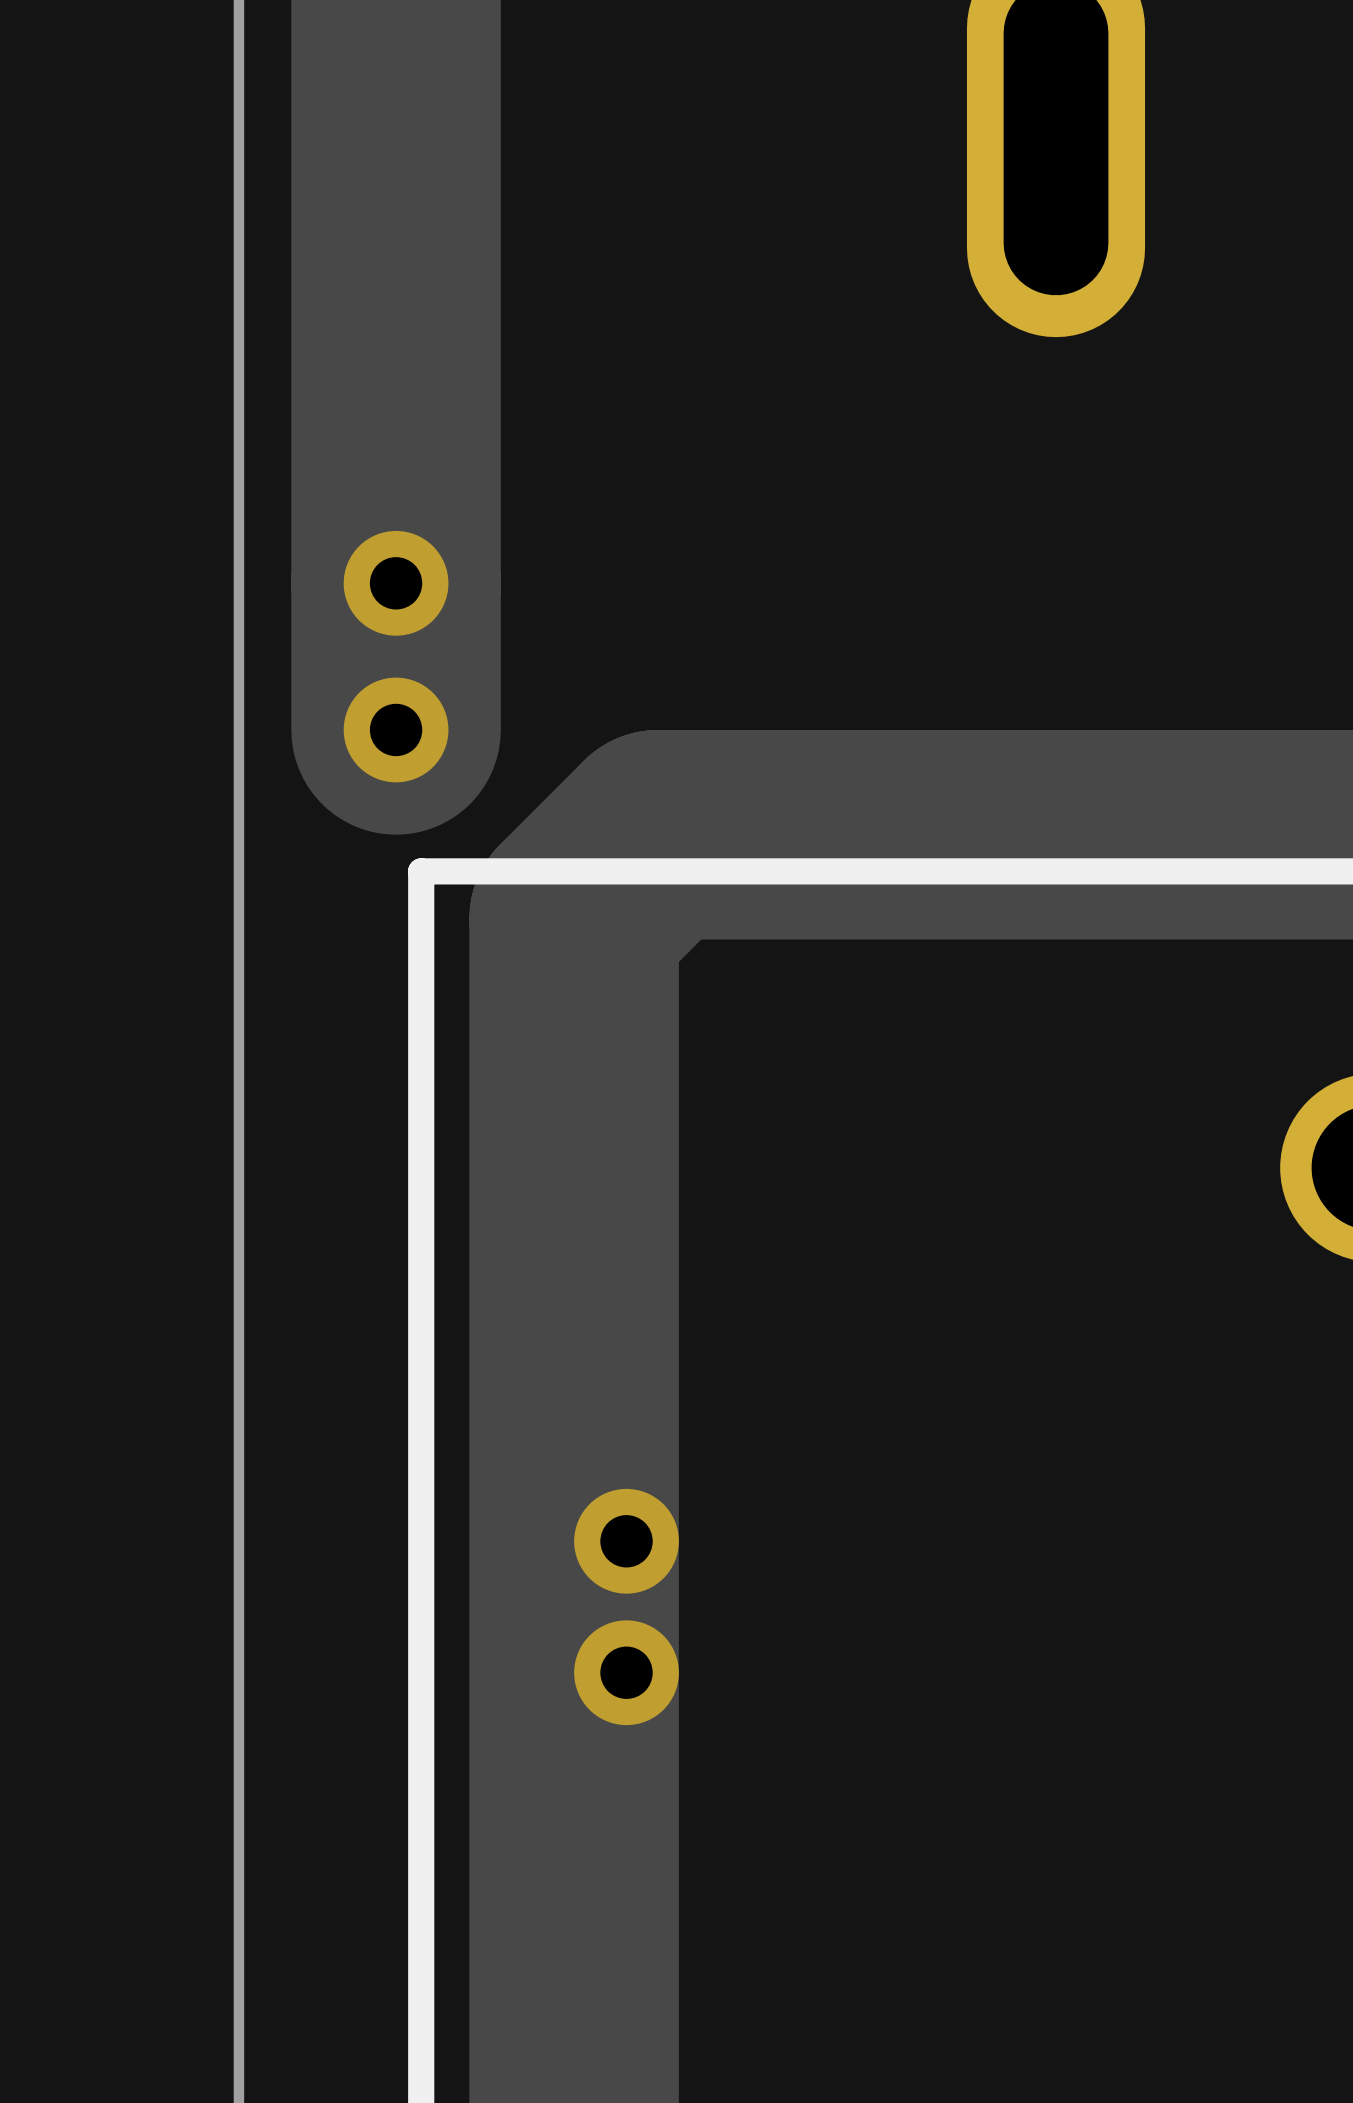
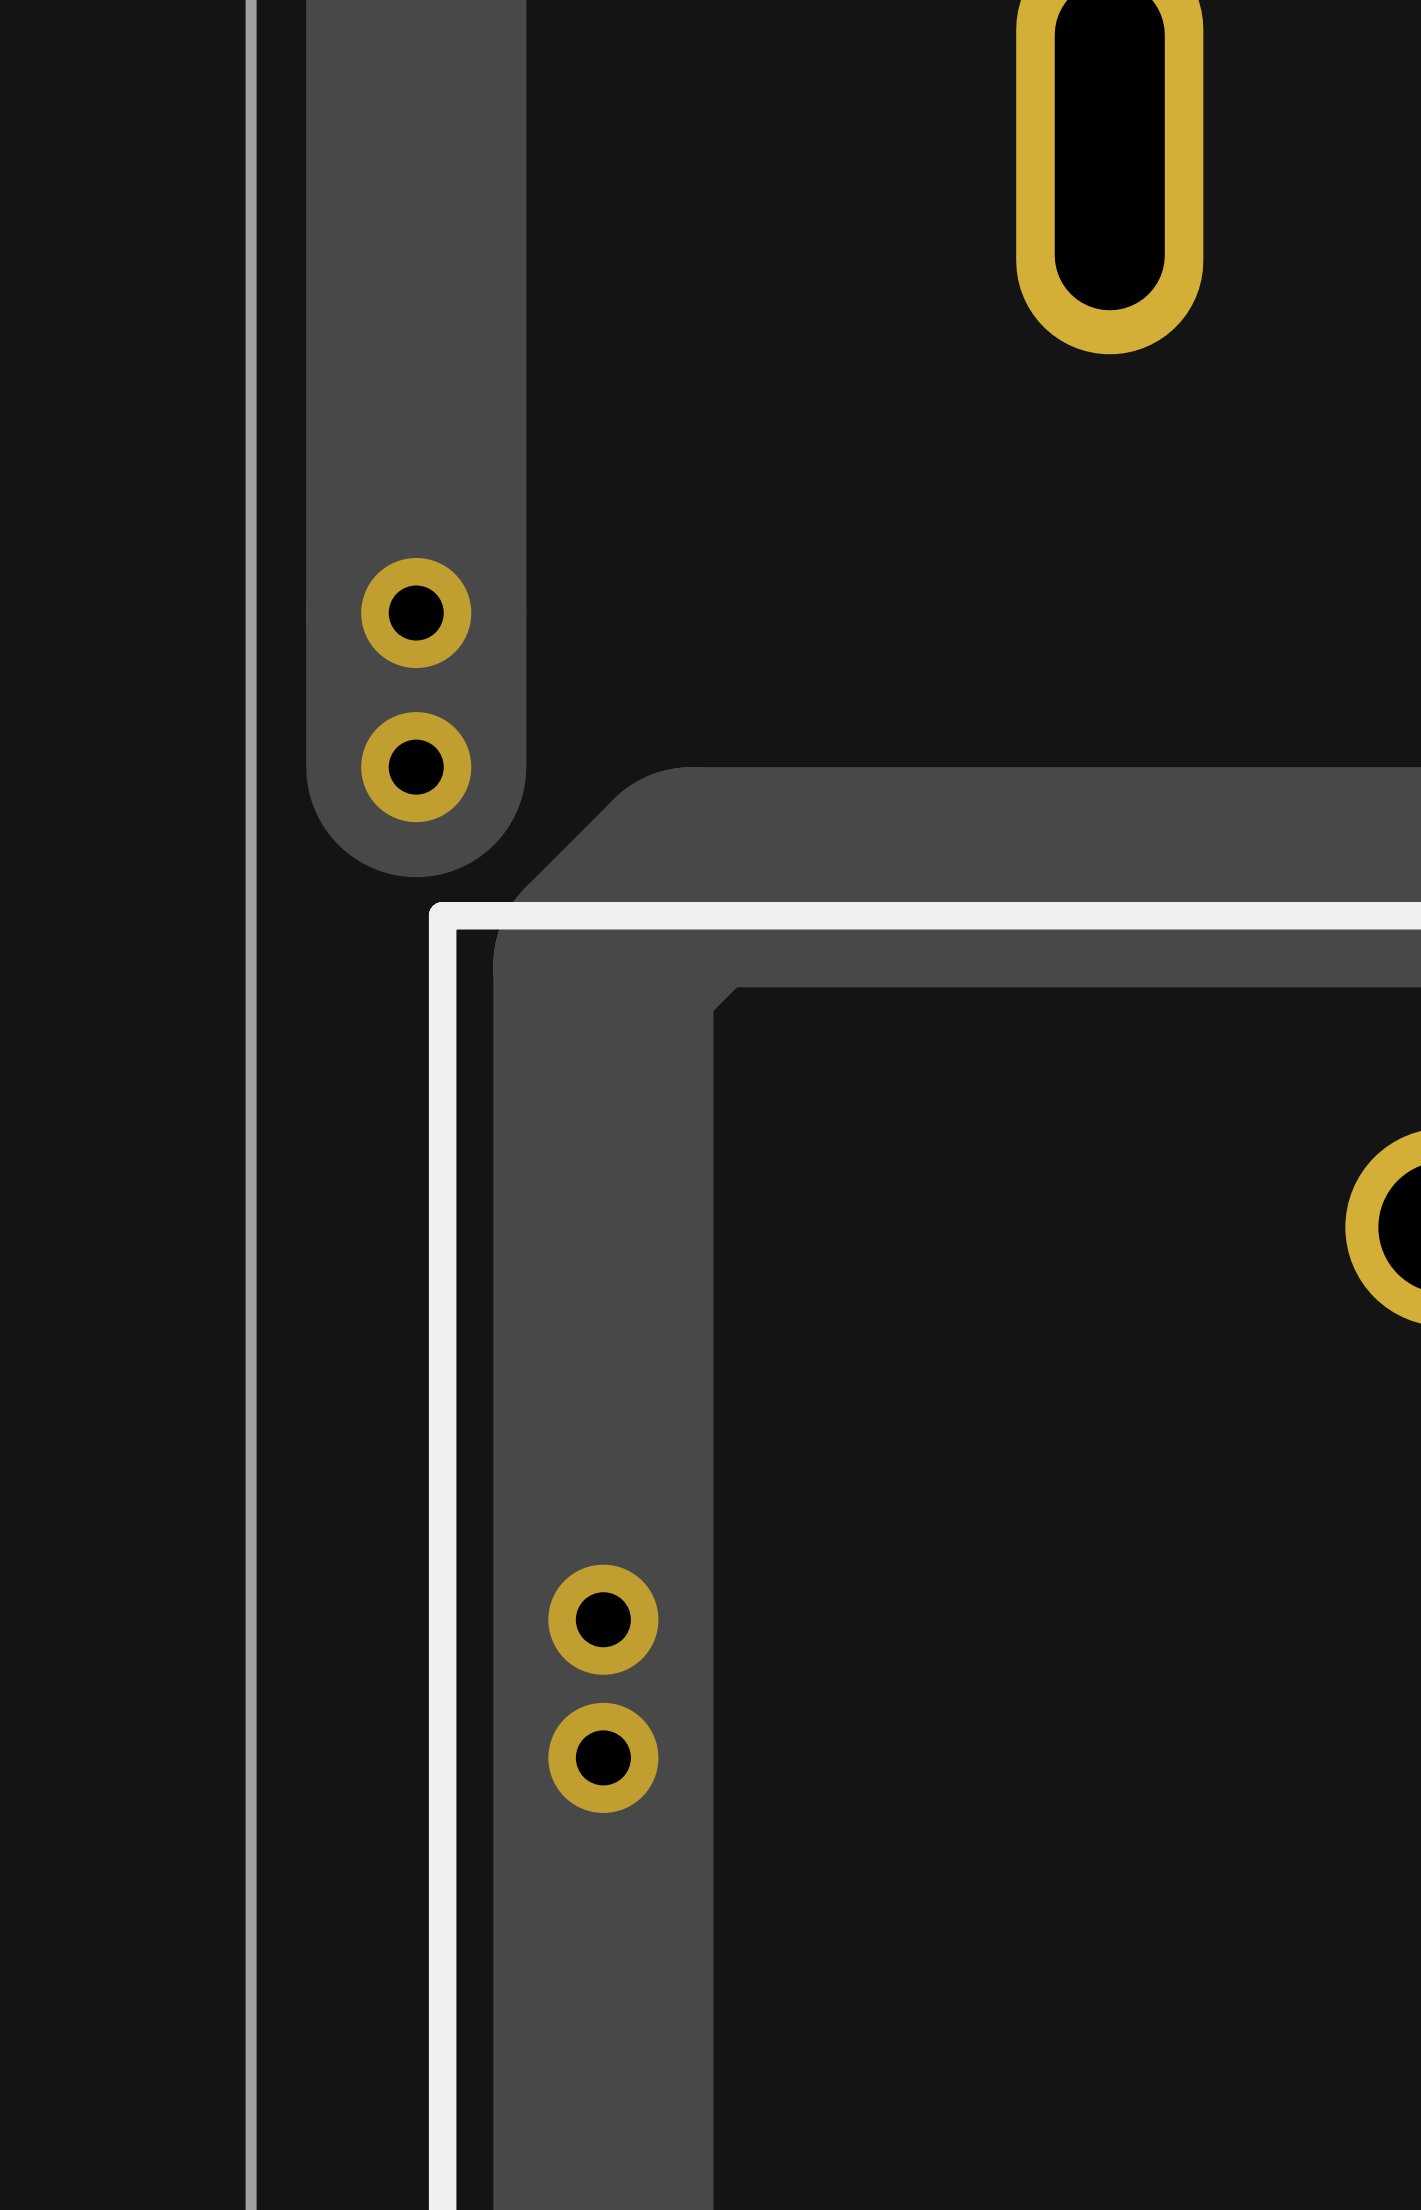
via position: (626, 1541) -> (603, 1619)
via position: (626, 1672) -> (603, 1757)

